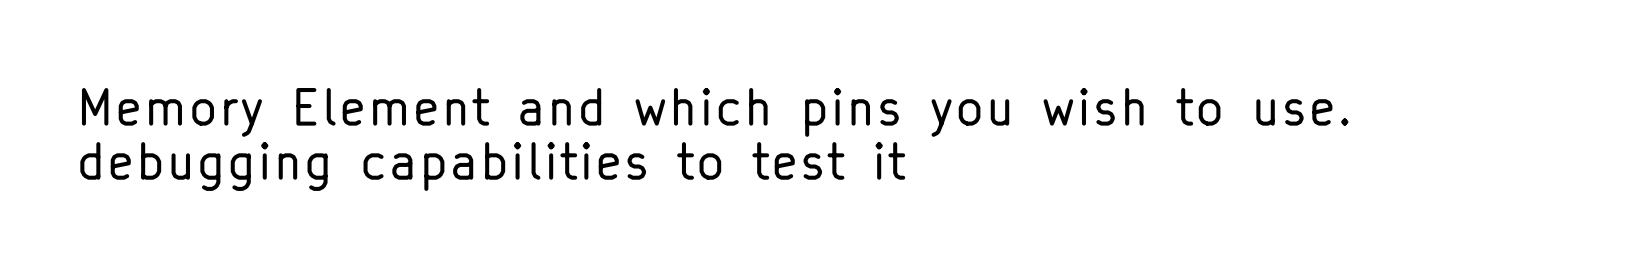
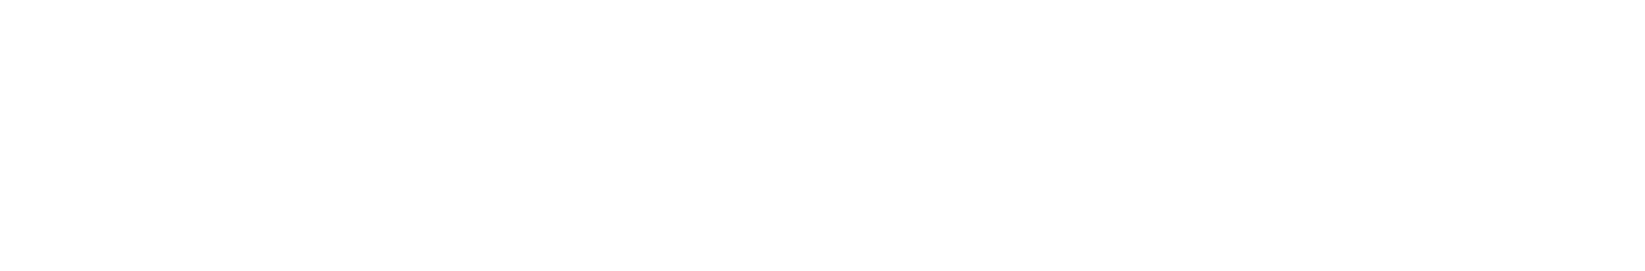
text: Memory Element and which pins you wish to use. (715, 112) -> none
text: debugging capabilities to test it (492, 166) -> none

